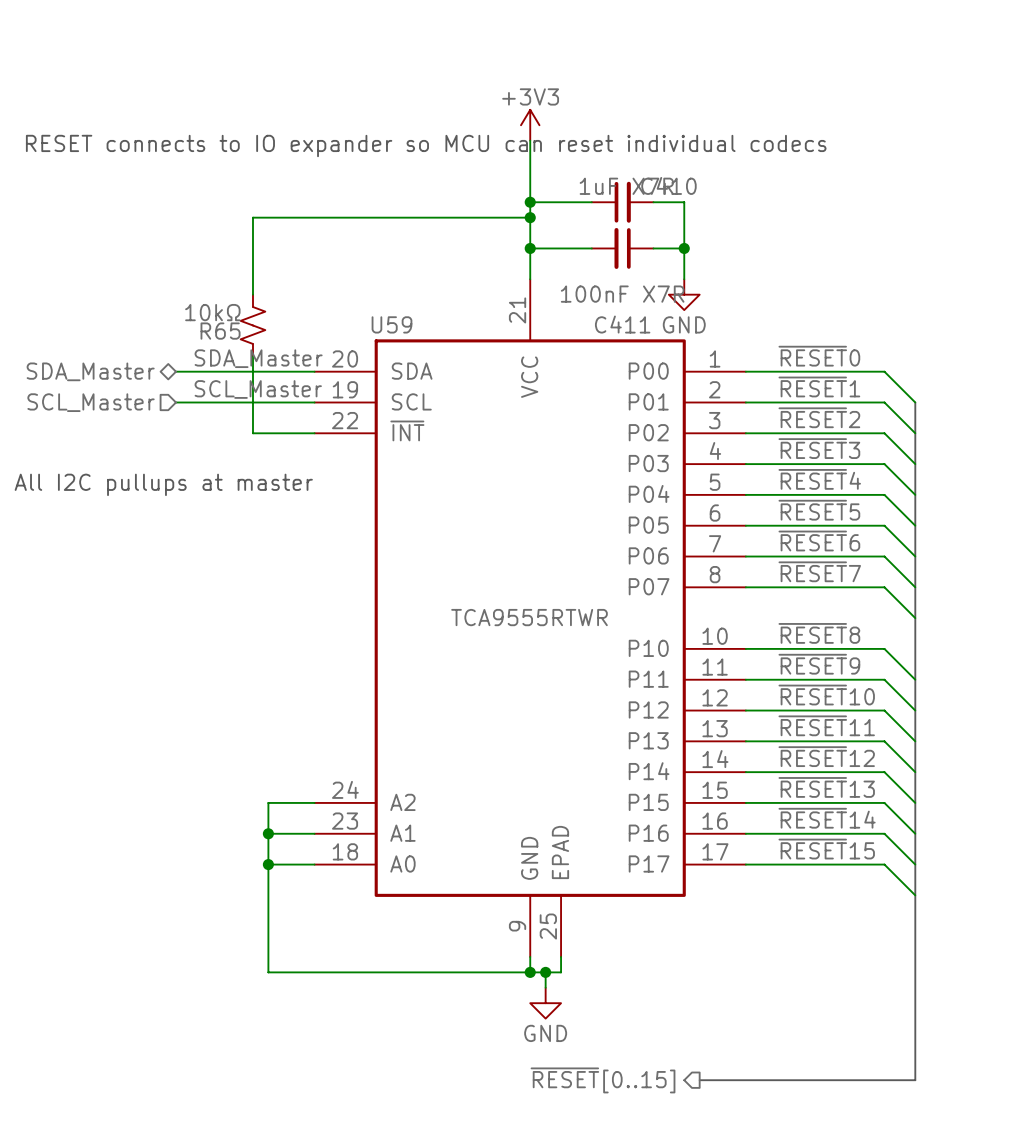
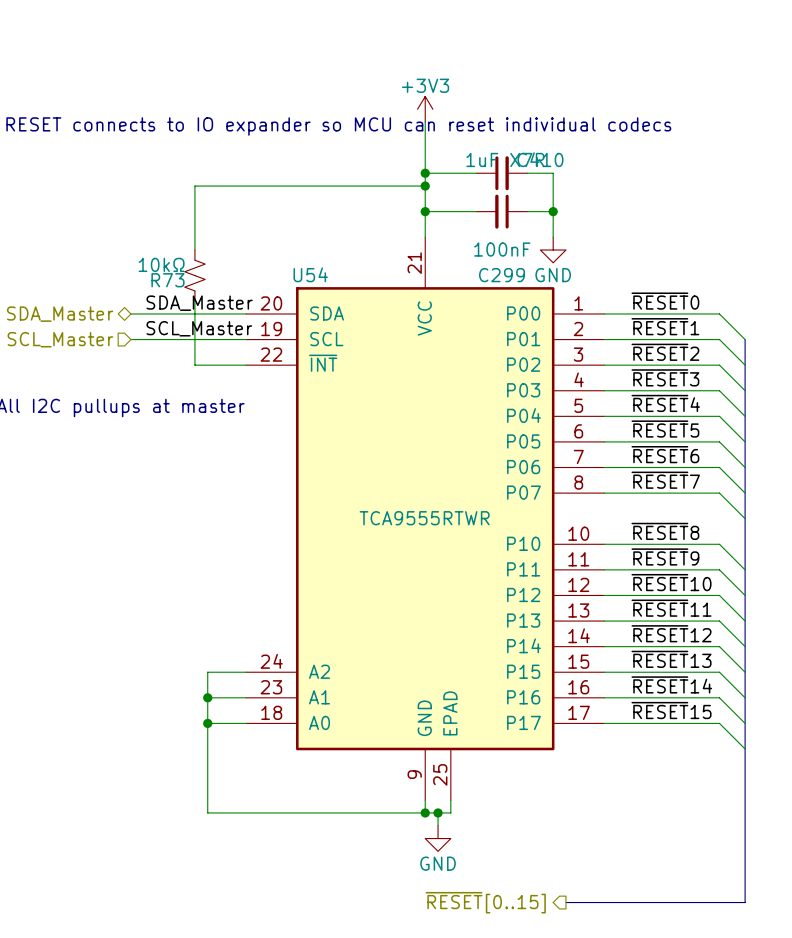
C411 value: 100nF X7R (622, 294) -> 100nF (502, 249)
U59 name: U59 (391, 324) -> U54 (310, 274)
C411 name: C411 (622, 324) -> C299 (502, 275)
R65 name: R65 (220, 331) -> R73 (167, 280)

